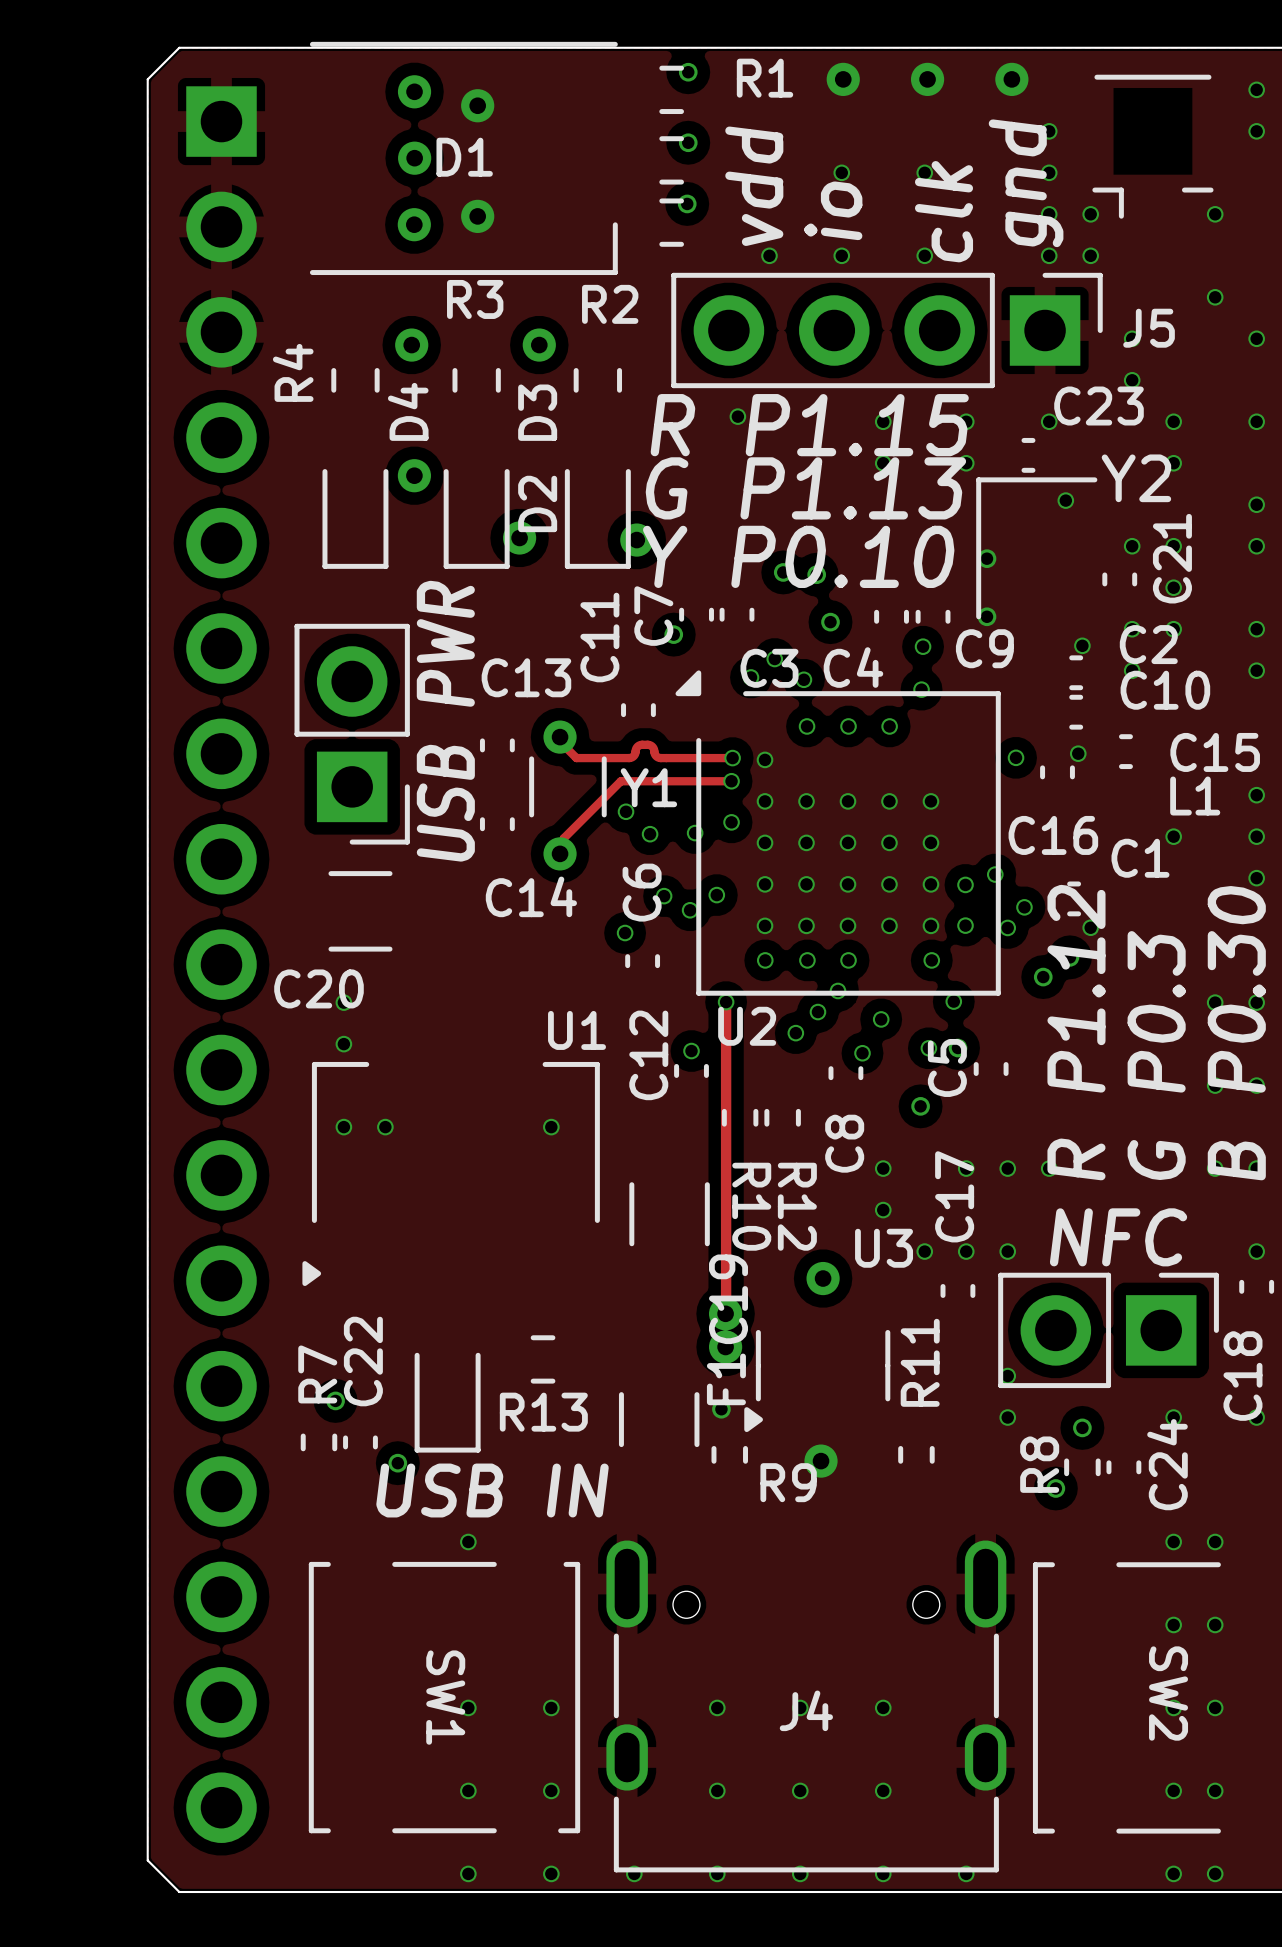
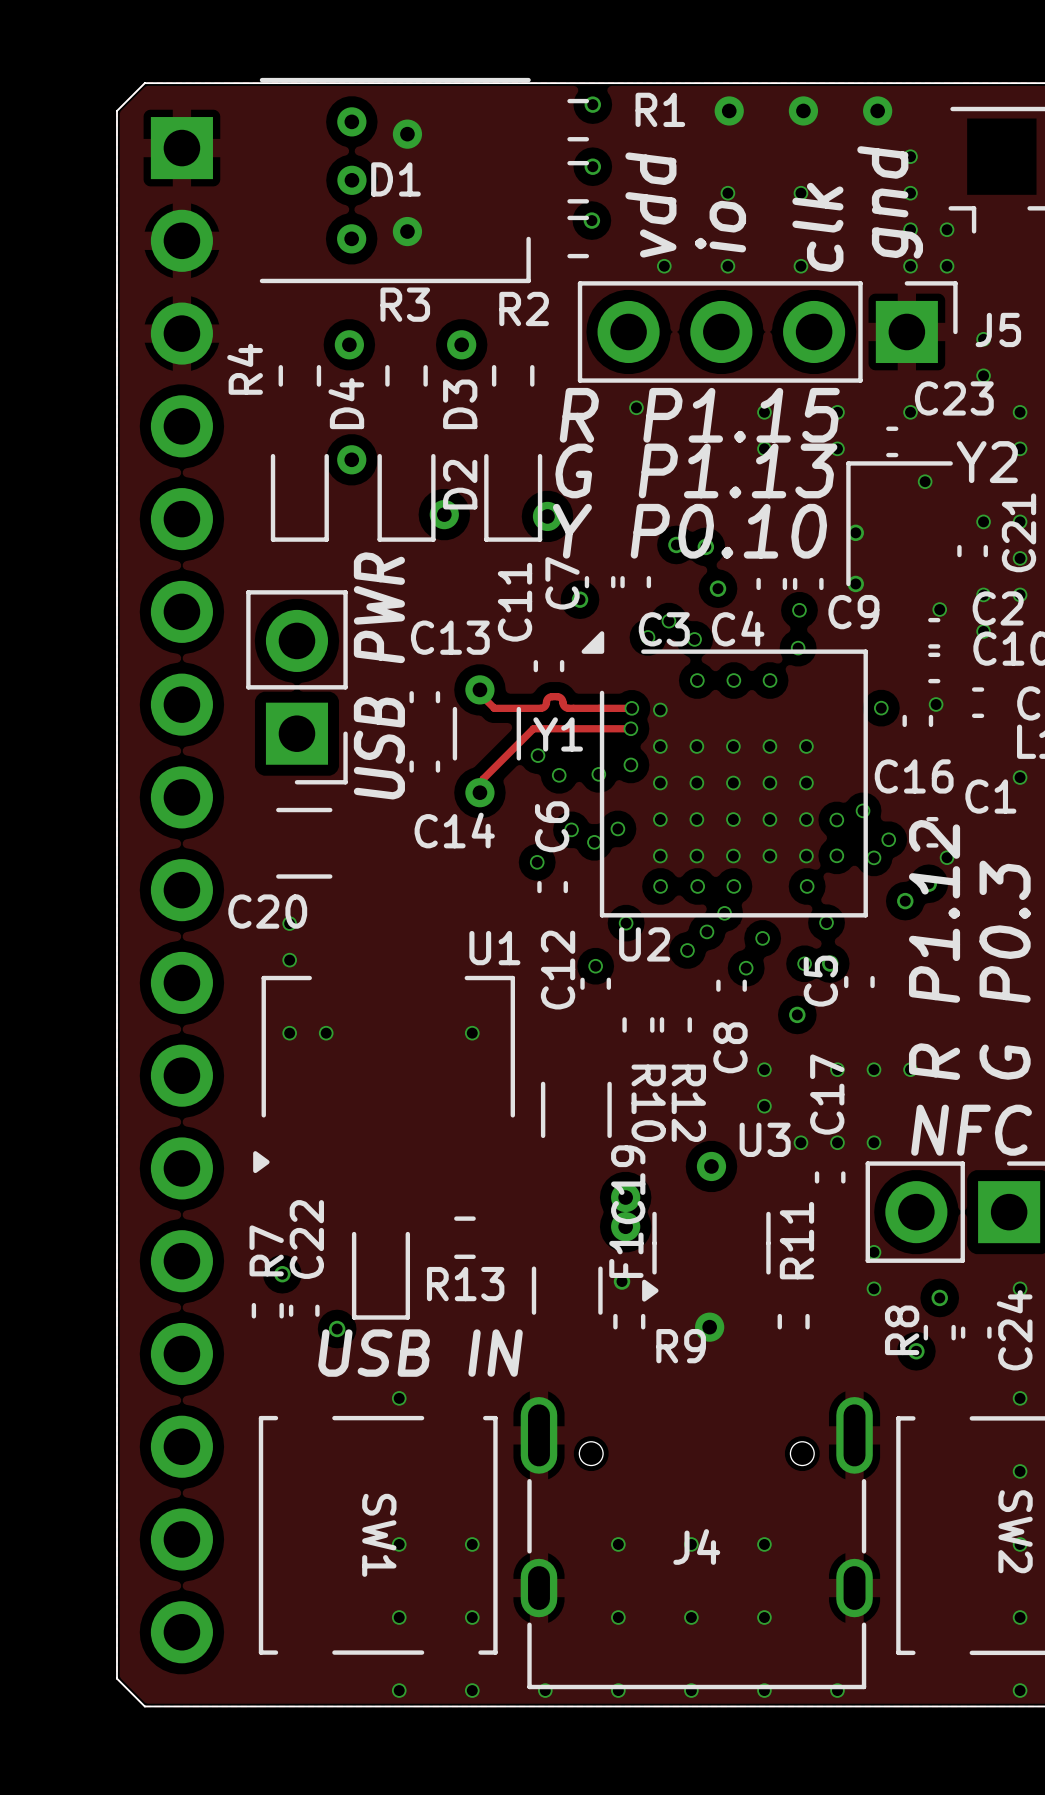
track: (726, 1002) (726, 1313) -> none

